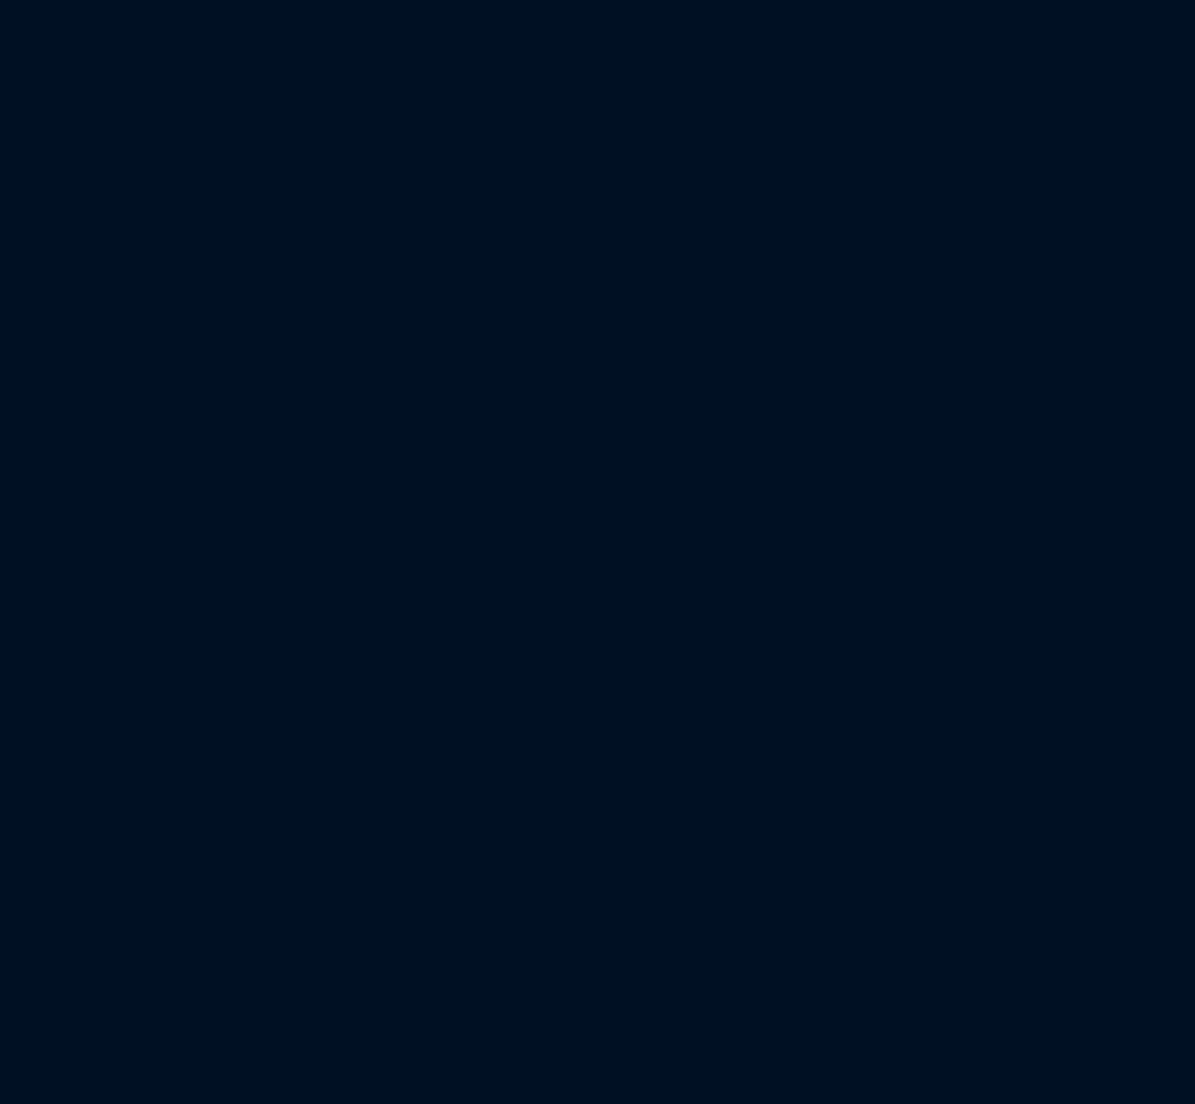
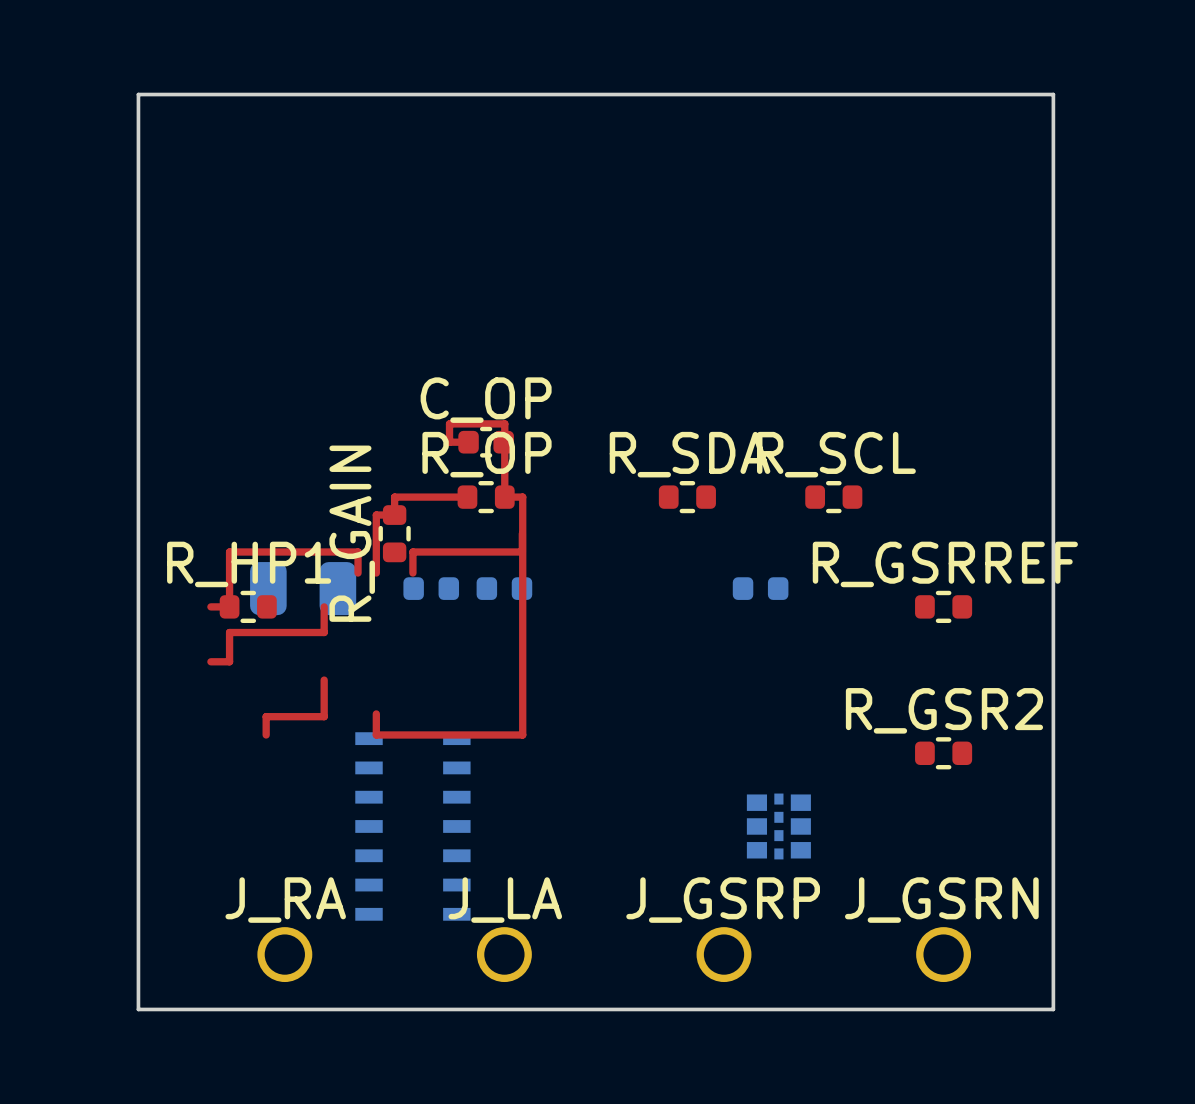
board edge: none -> (138, 94) (1053, 94) (1053, 1009) (138, 1009) (138, 94)
top track: none -> (468, 442) (449, 442) (449, 423) (504, 423) (504, 497) (522, 497) (522, 734) (376, 734) (376, 713)
C_OP: none -> (486, 442)
top track: none -> (467, 497) (394, 497) (394, 515) (376, 515) (376, 573)
R_OP: none -> (486, 497)
R_SDA: none -> (687, 497)
R_SCL: none -> (833, 497)
R_GAIN: none -> (394, 533)
top track: none -> (522, 533) (522, 551) (412, 551) (412, 573)
top track: none -> (358, 573) (358, 551) (229, 551) (229, 606) (210, 606)
part: none -> (303, 588)
part: none -> (431, 588)
part: none -> (504, 588)
part: none -> (760, 588)
R_HP1: none -> (248, 606)
top track: none -> (324, 606) (324, 632) (229, 632) (229, 661) (210, 661)
R_GSRREF: none -> (943, 606)
top track: none -> (324, 680) (324, 716) (266, 716) (266, 734)
R_GSR2: none -> (943, 753)
part: none -> (412, 826)
part: none -> (778, 826)
J_RA: none -> (284, 954)
J_LA: none -> (504, 954)
J_GSRP: none -> (724, 954)
J_GSRN: none -> (943, 954)

